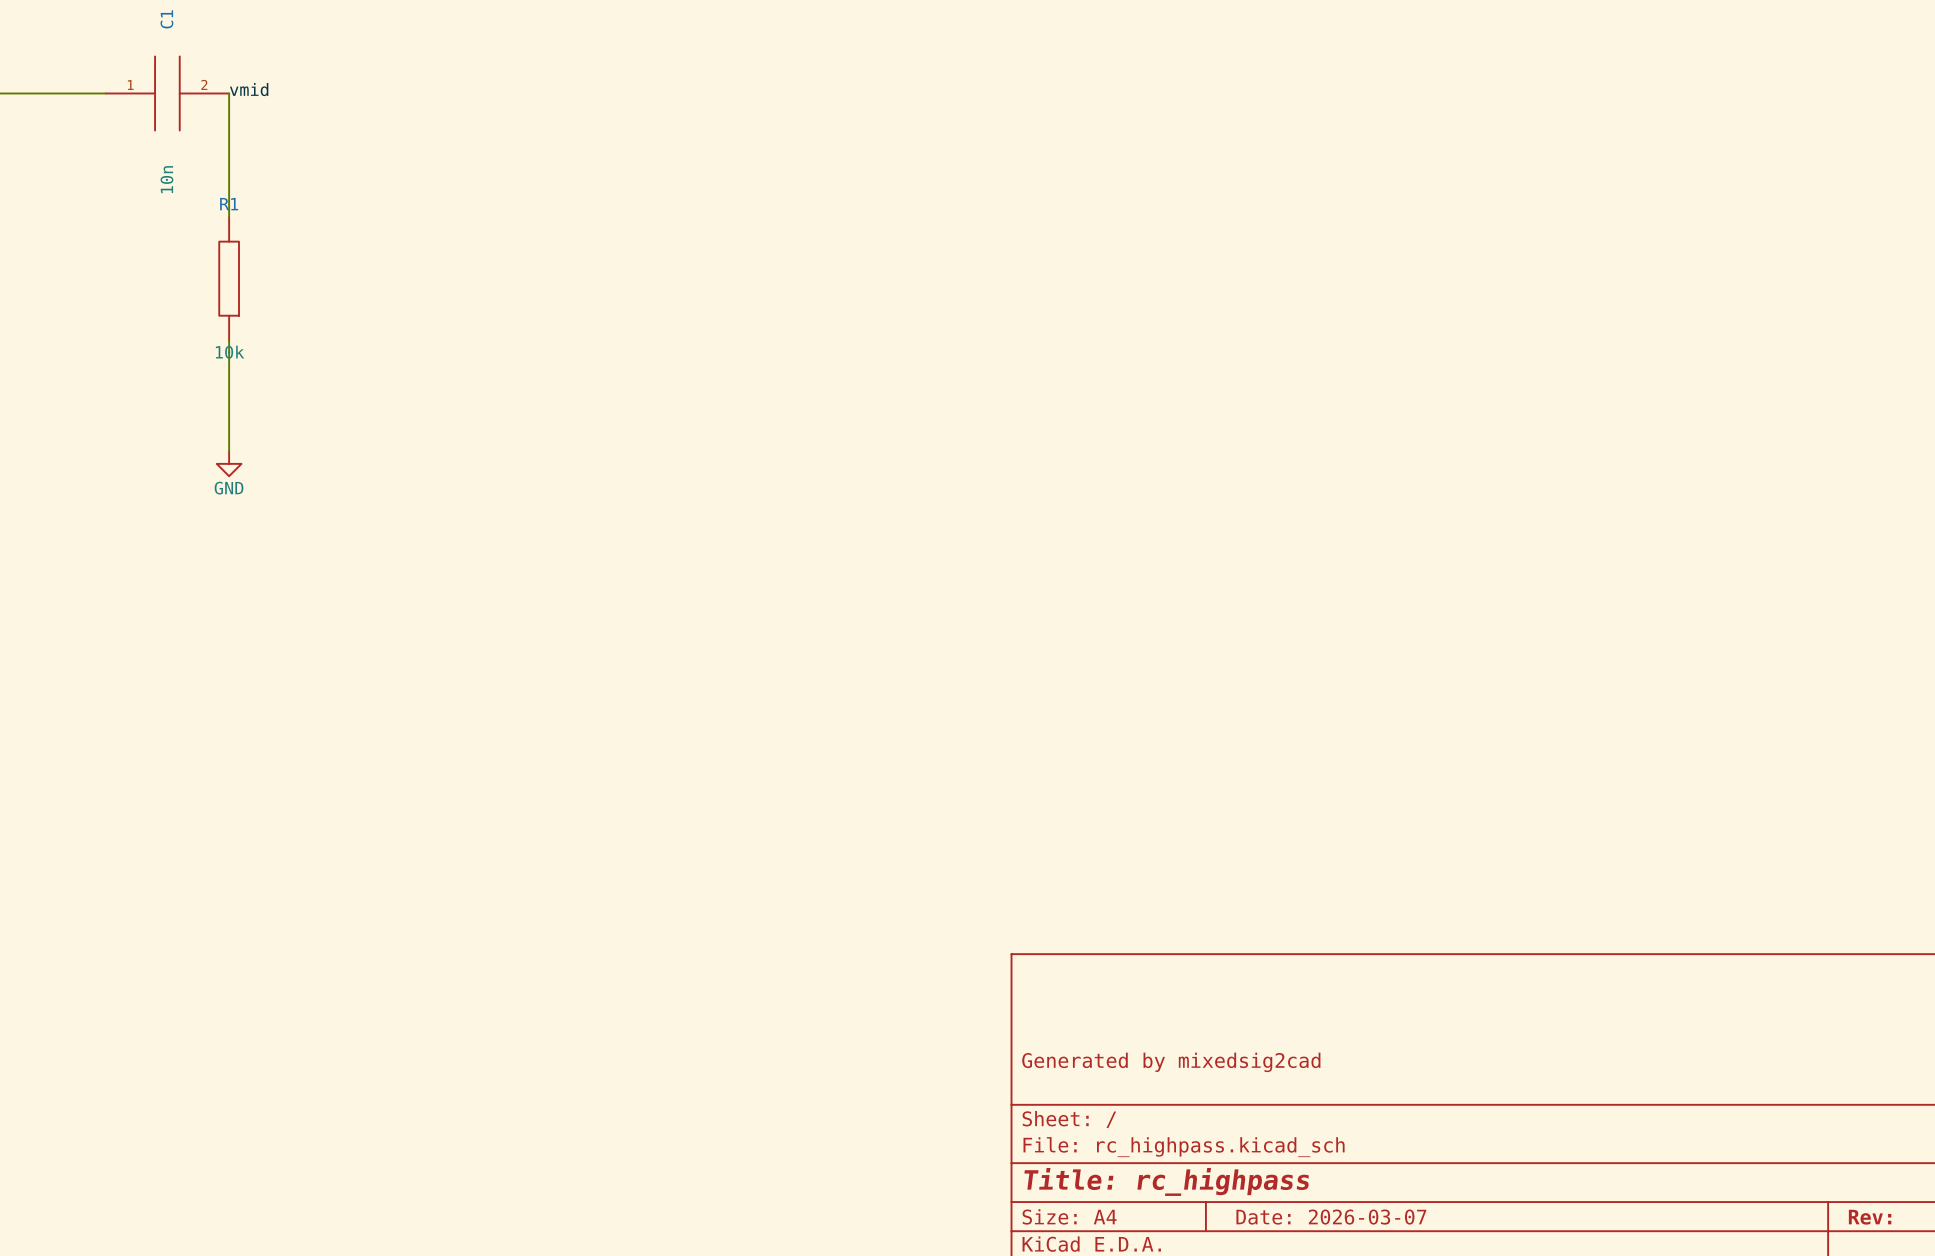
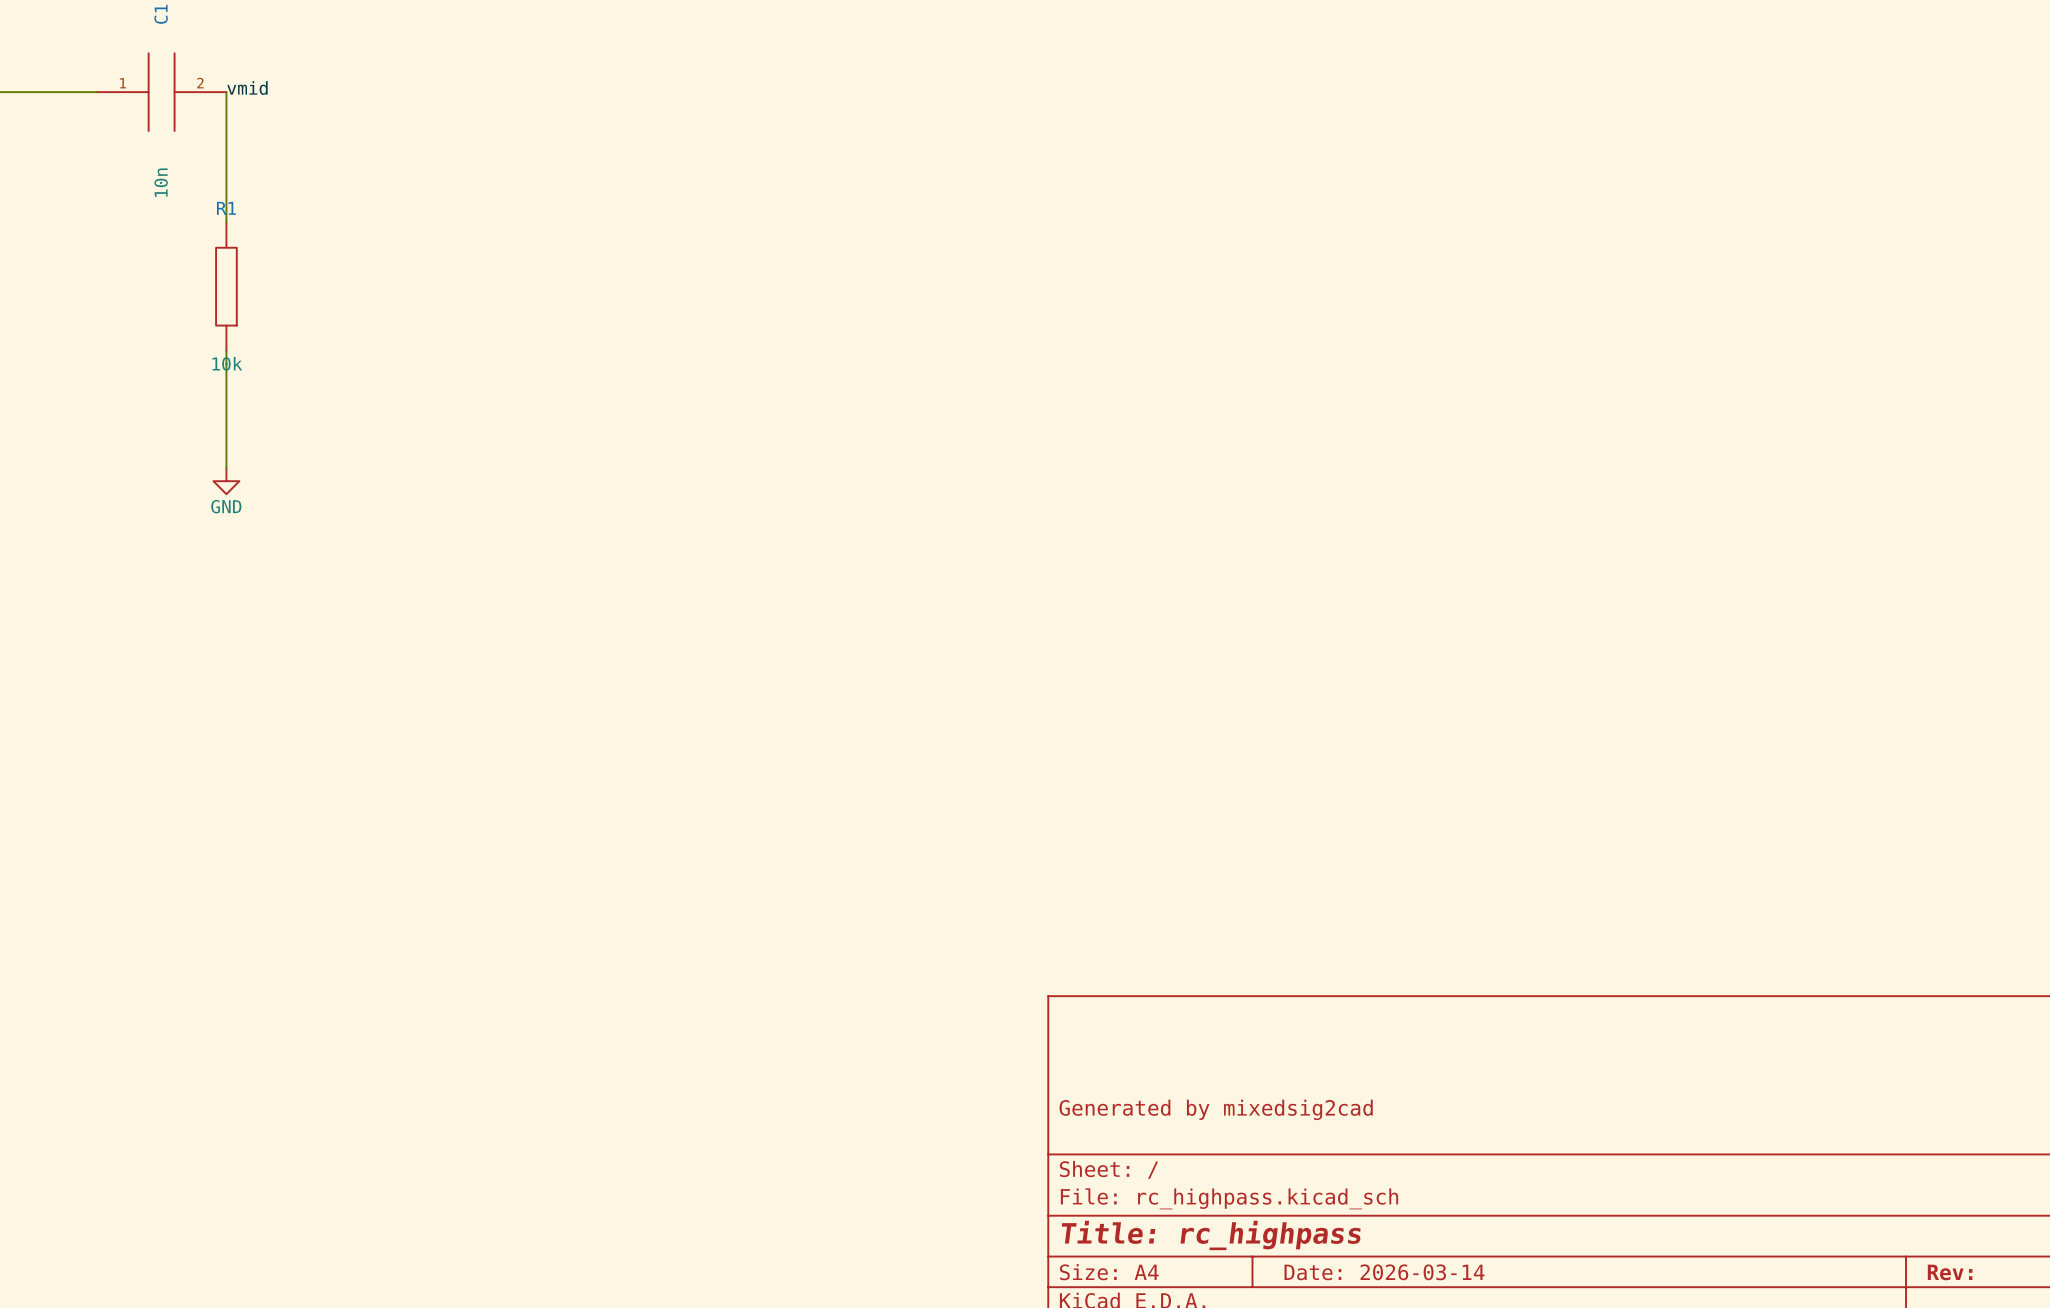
title block: Date: 2026-03-07 (1331, 1217) -> Date: 2026-03-14 (1384, 1272)

